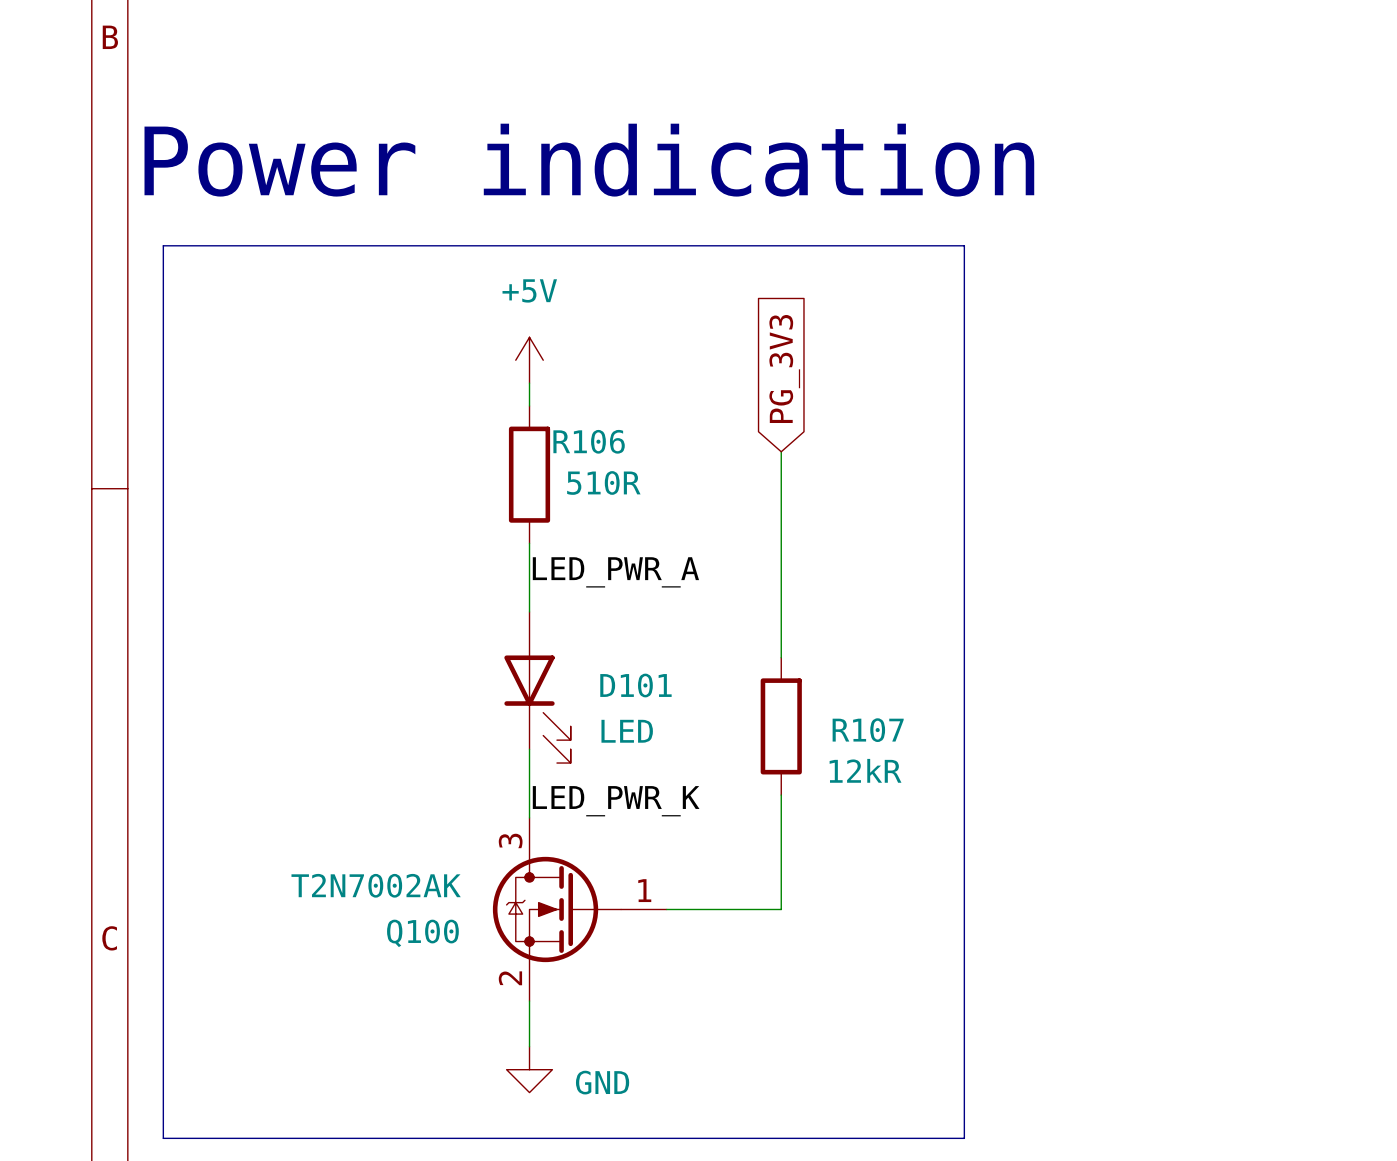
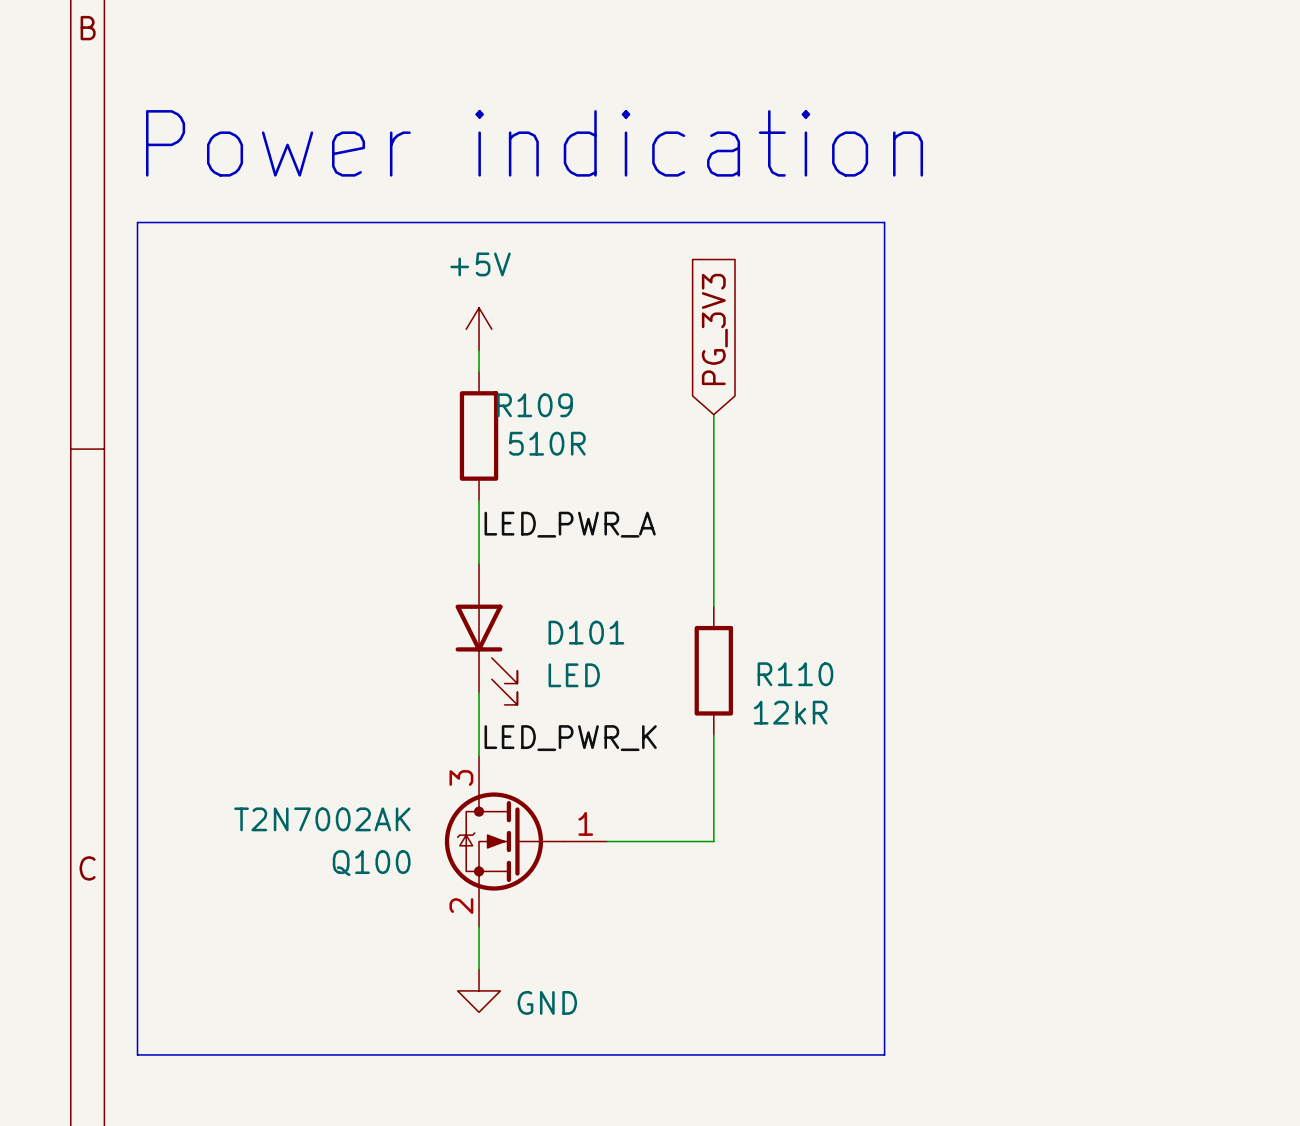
R106 name: R106 (589, 441) -> R109 (535, 405)
R107 name: R107 (868, 730) -> R110 (795, 674)

